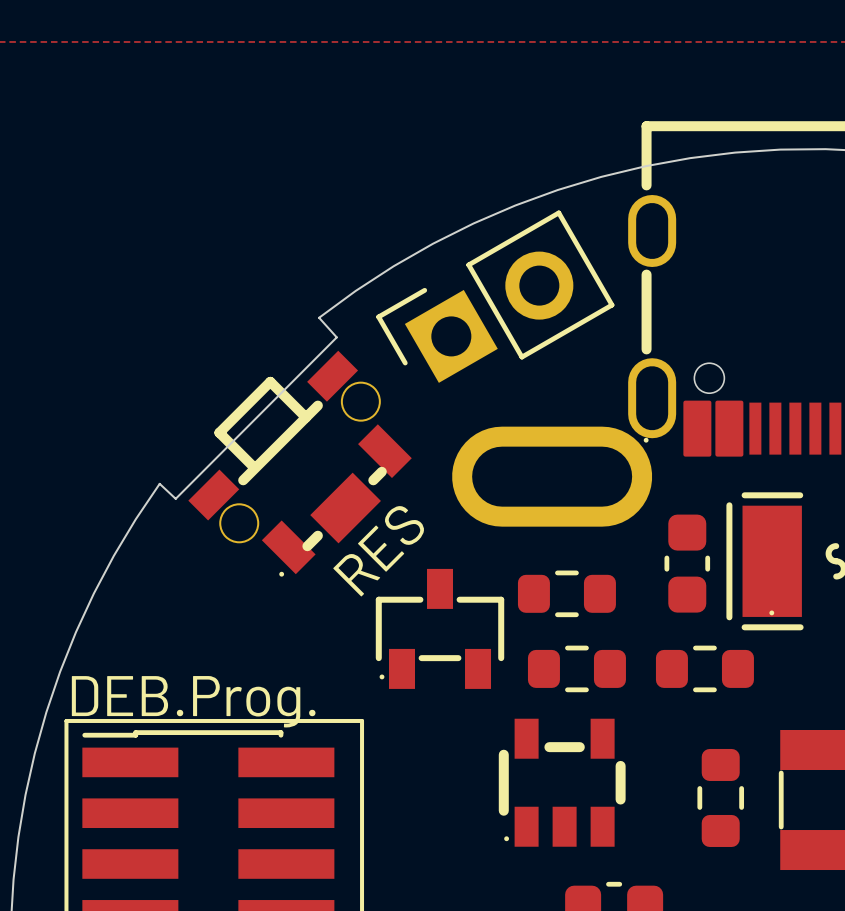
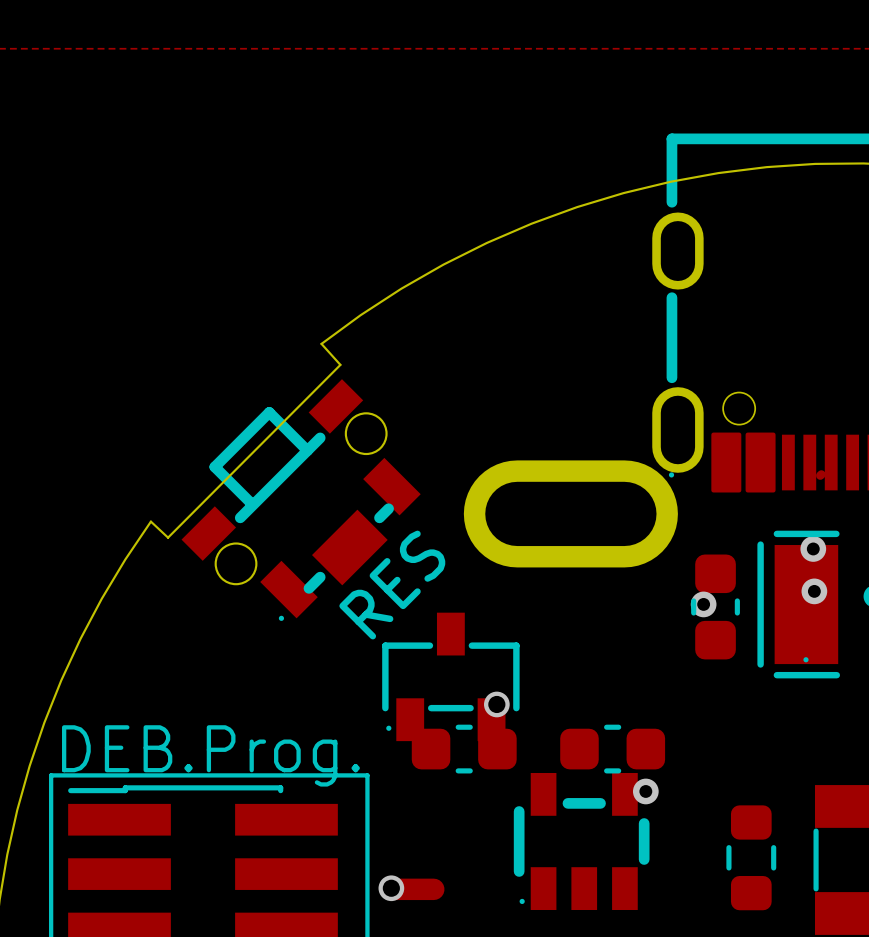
part: (495, 296) -> none
track: none -> (821, 474) (820, 475)
via: none -> (813, 548)
via: none -> (814, 591)
via: none -> (703, 604)
part: (566, 593) -> none
part footprint: [527, 645, 626, 693] -> [560, 724, 666, 774]
via: none -> (496, 704)
part: (704, 668) -> none
part: none -> (464, 749)
via: none -> (645, 791)
track: none -> (391, 888) (433, 889)
via: none -> (391, 888)

